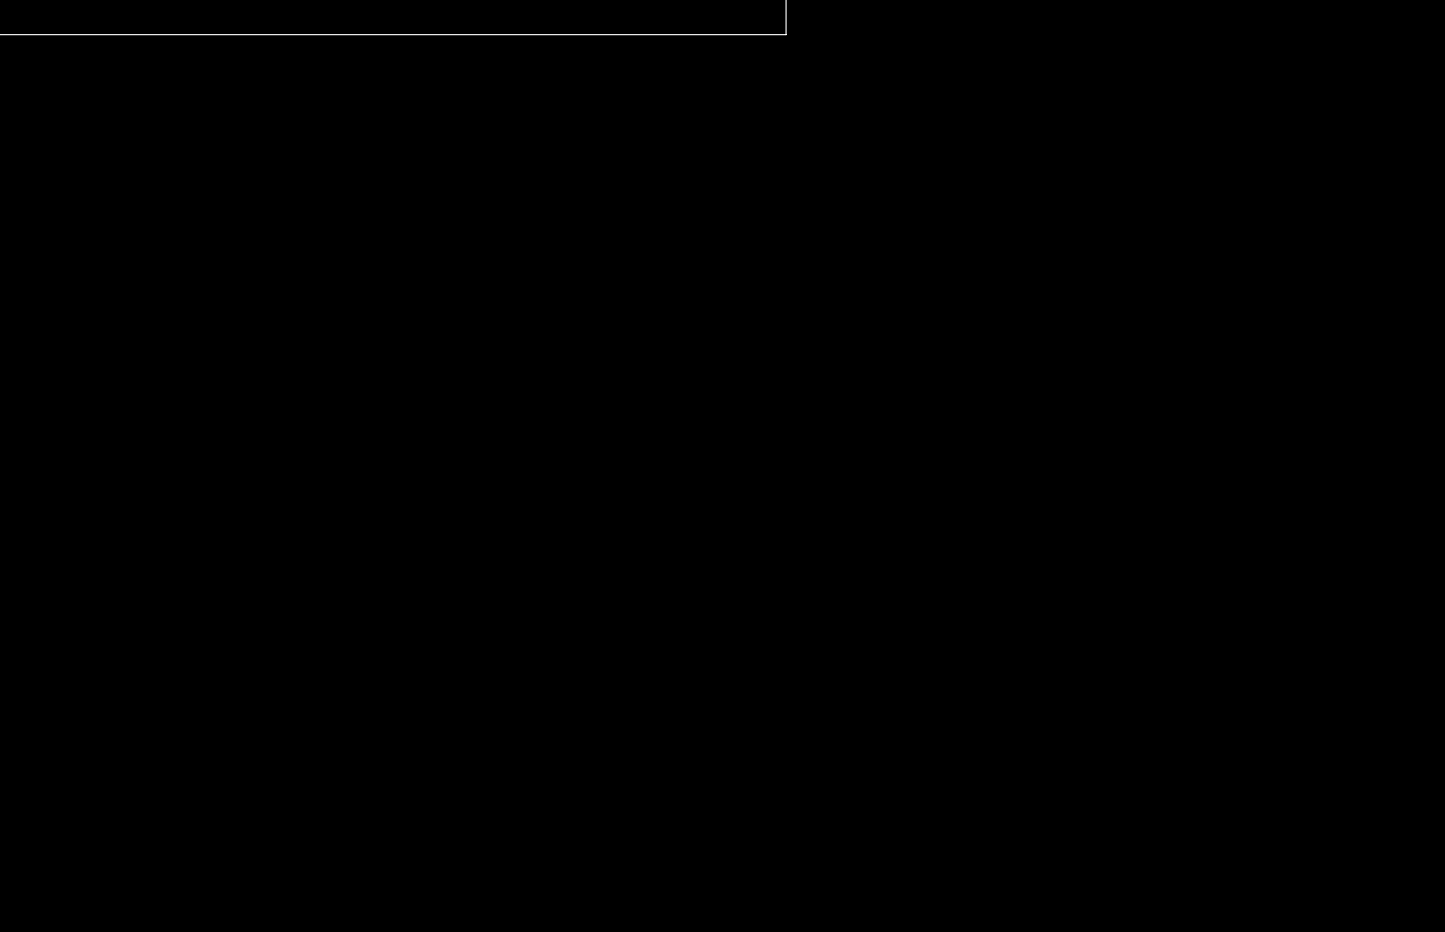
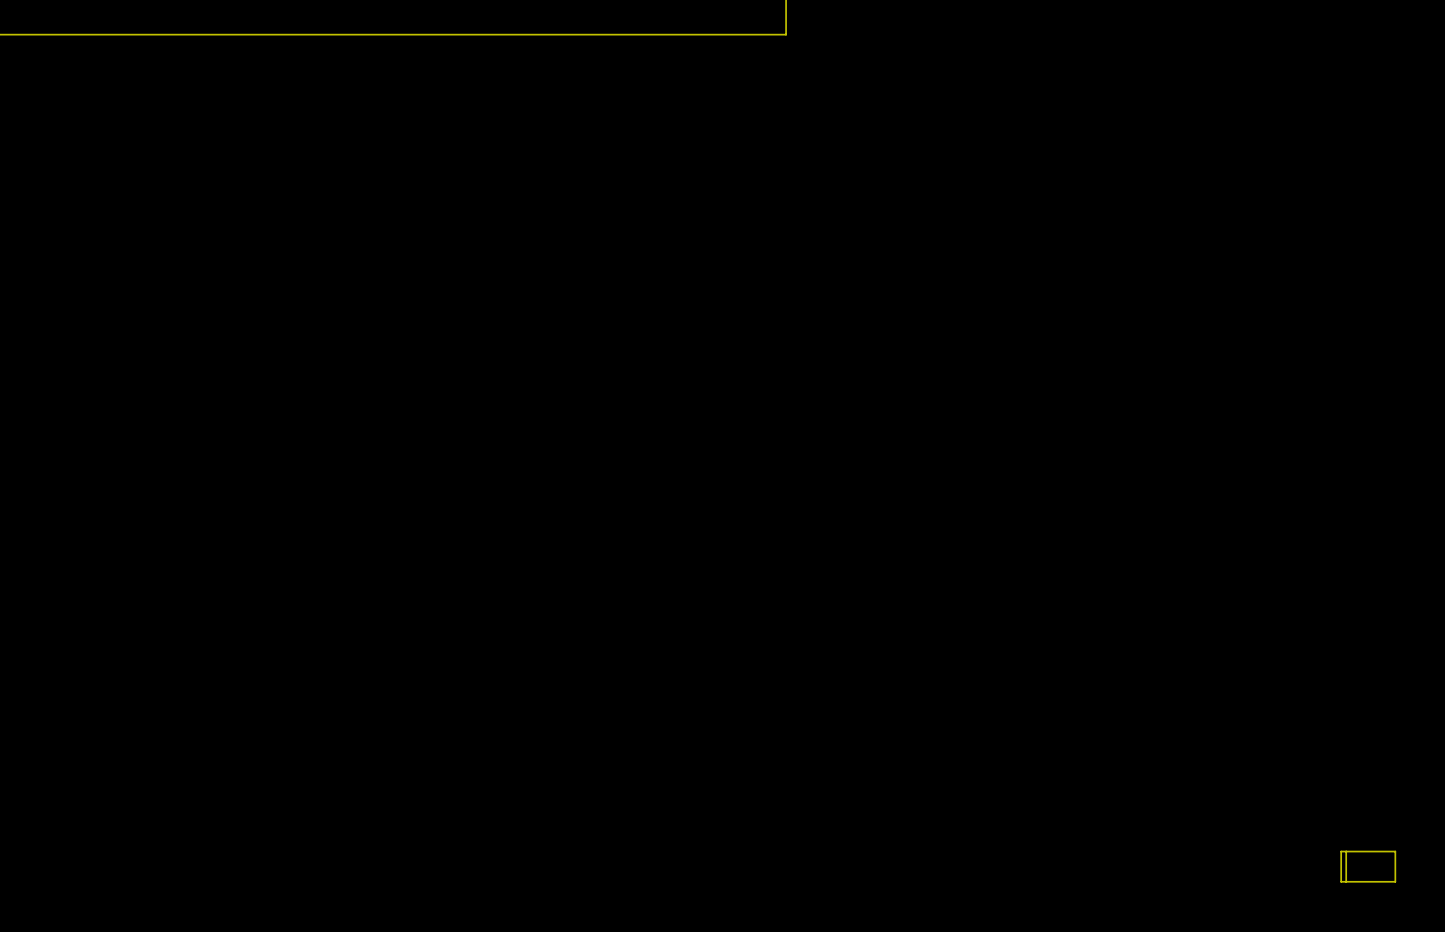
part: none -> (1368, 866)

